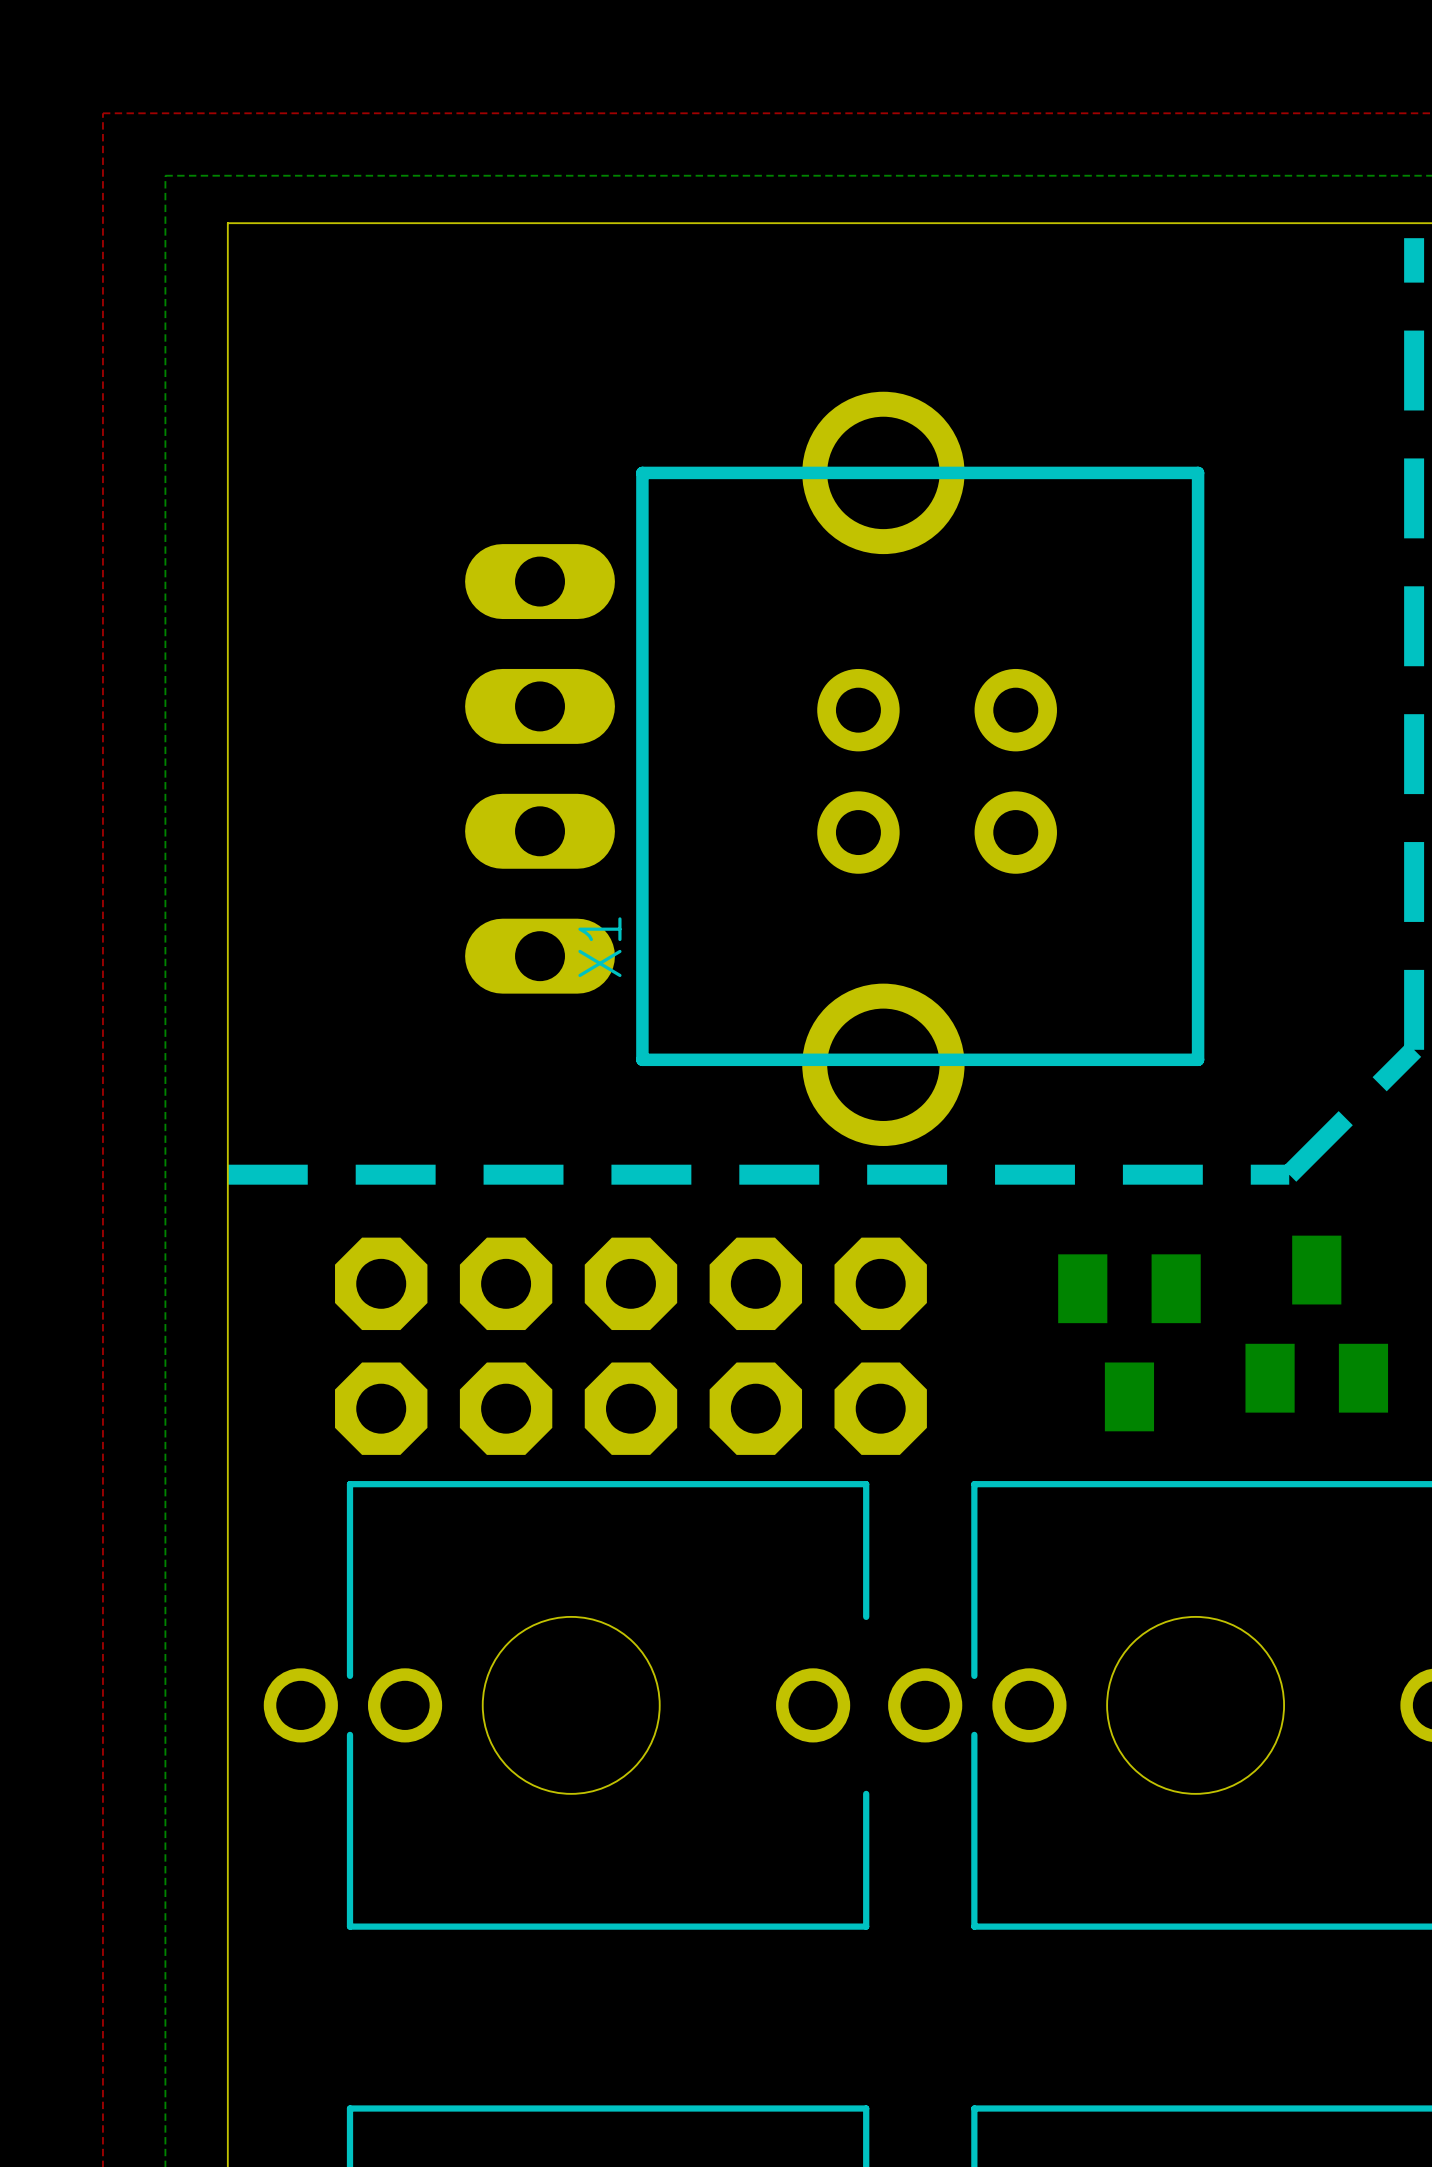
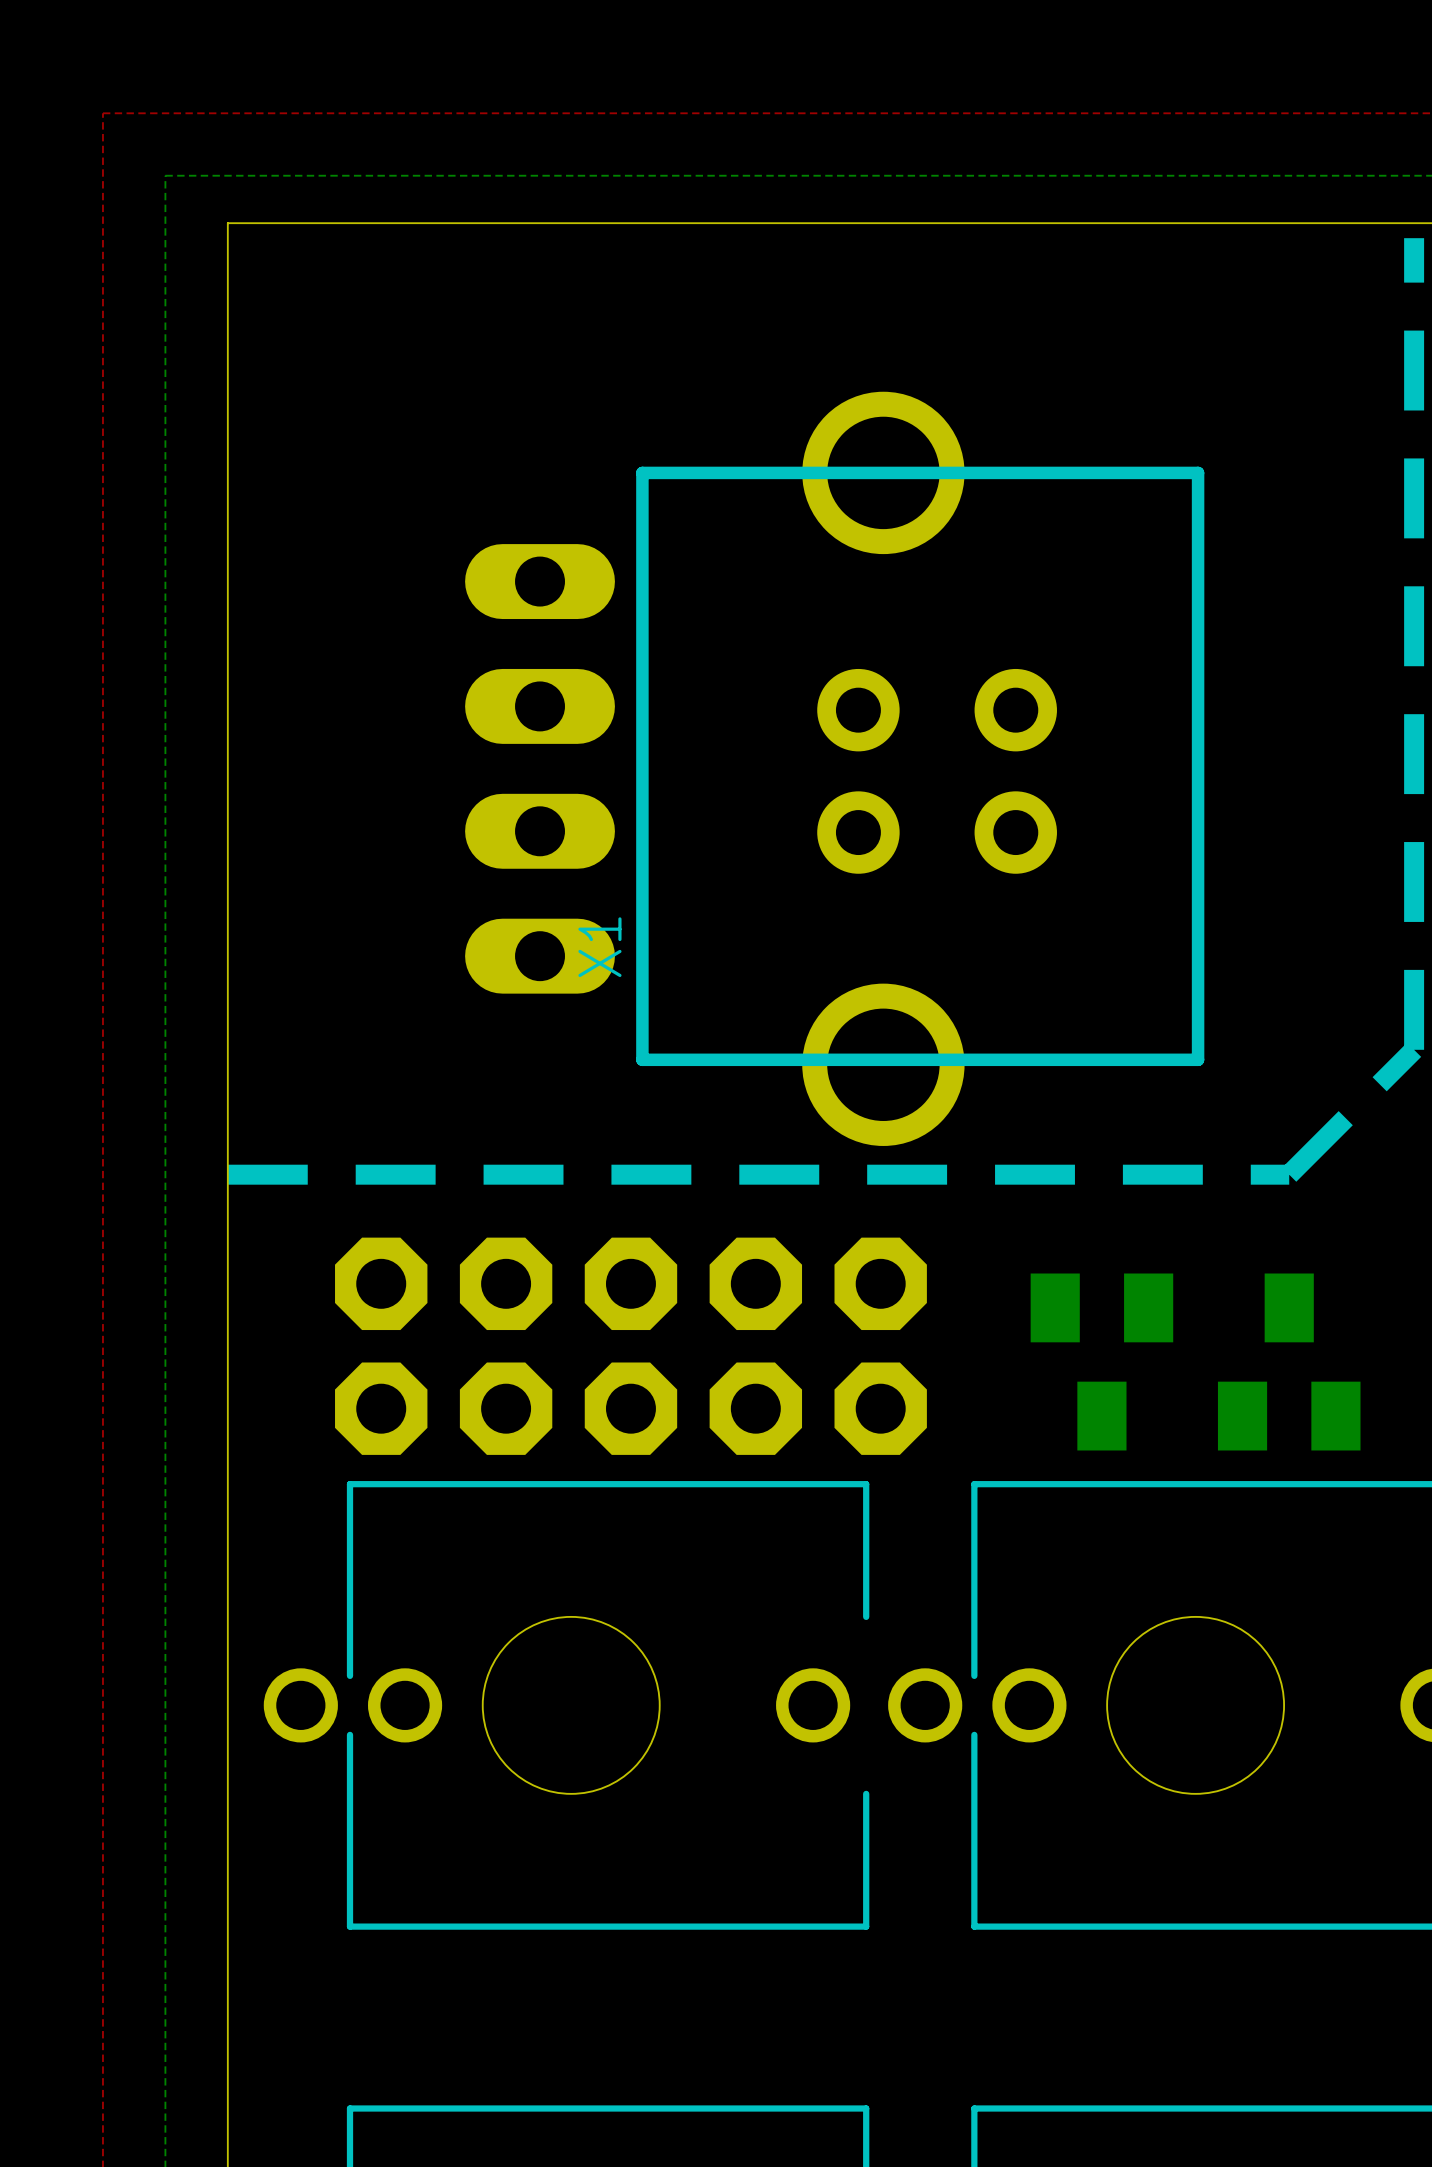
part position: (1316, 1324) -> (1289, 1361)
part position: (1129, 1342) -> (1101, 1361)

